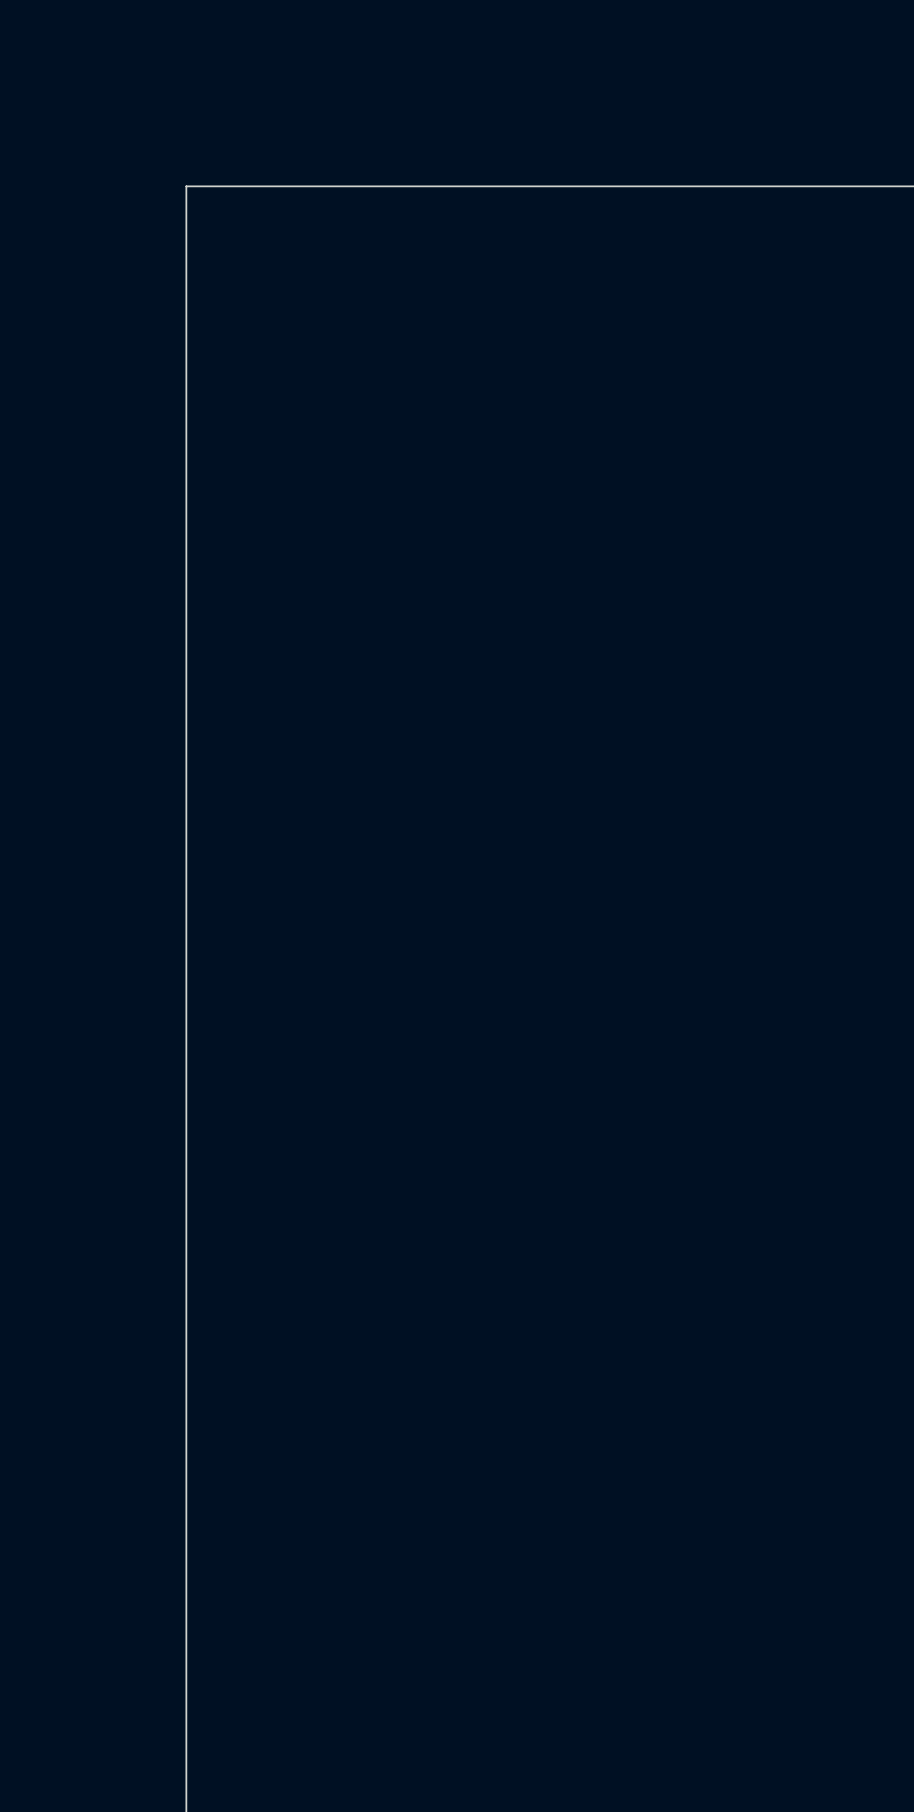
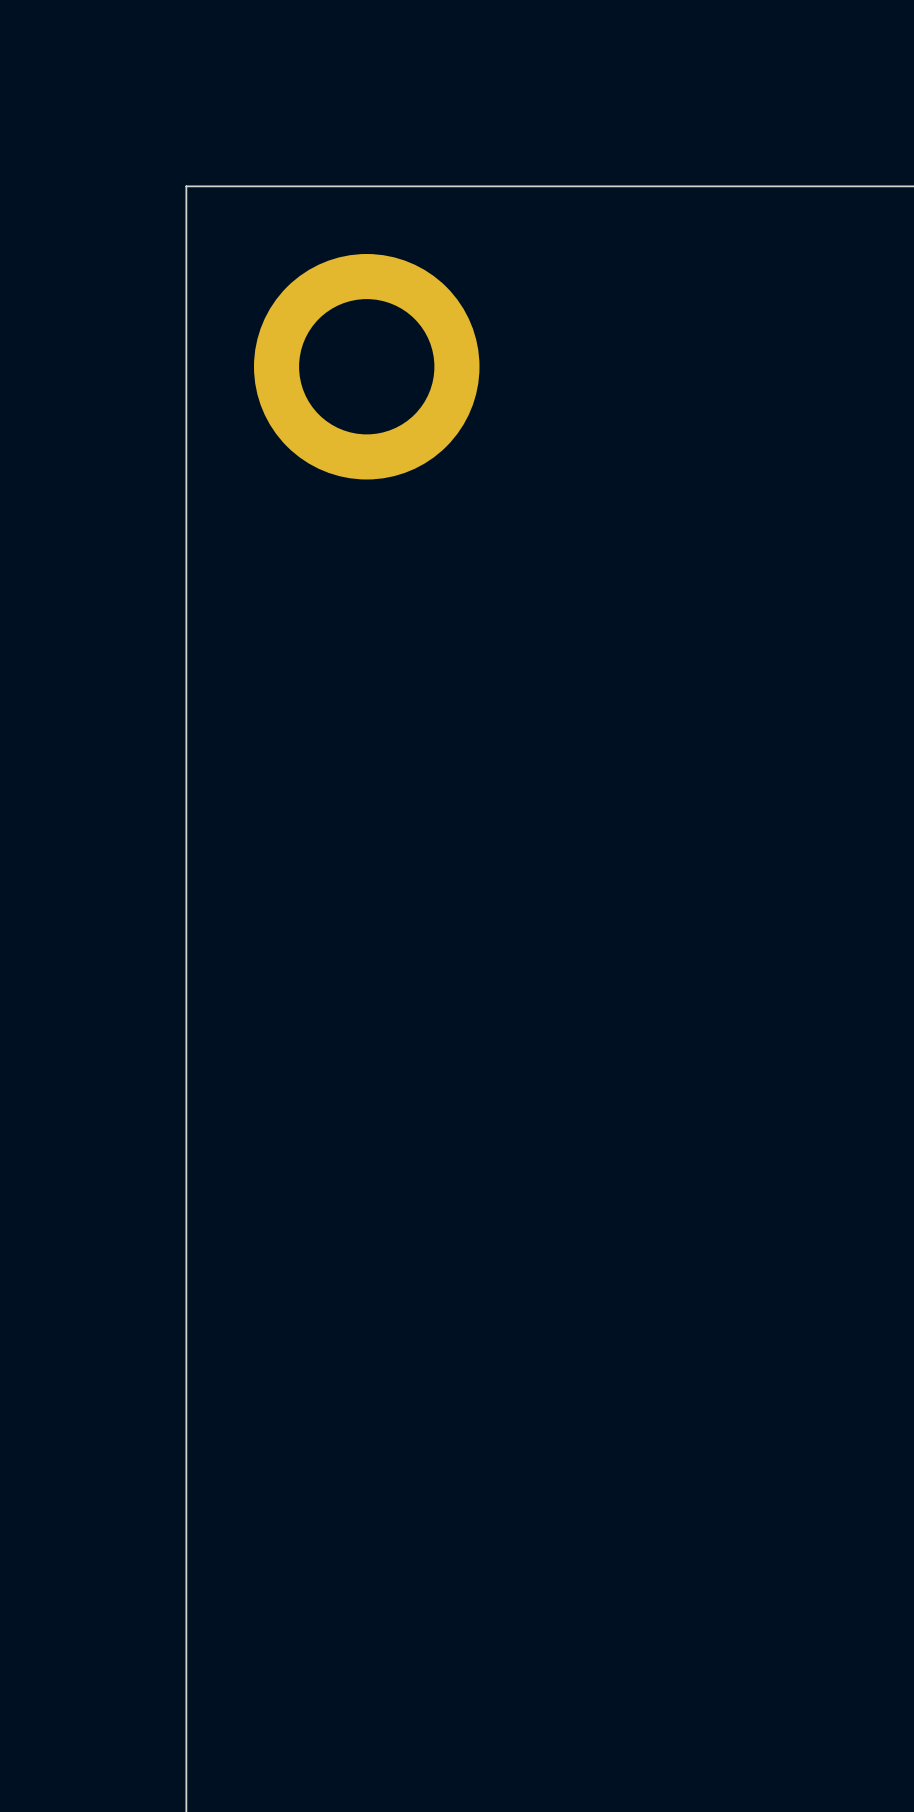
part: none -> (366, 366)

